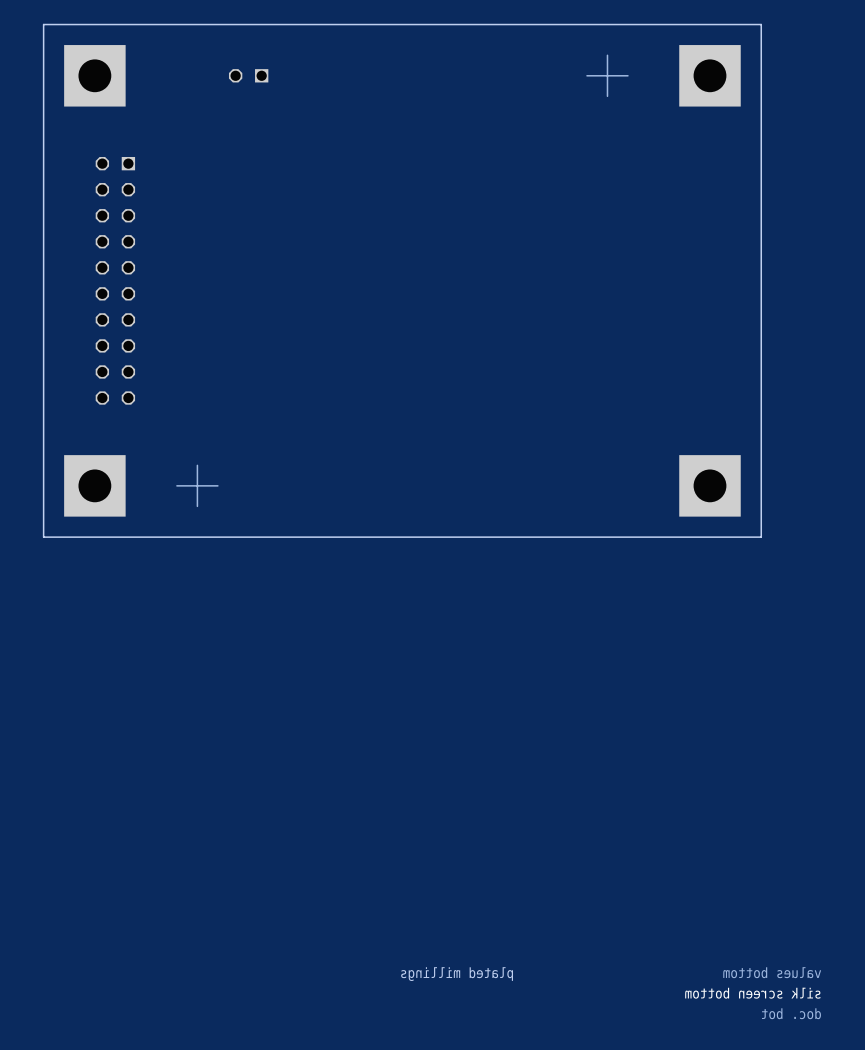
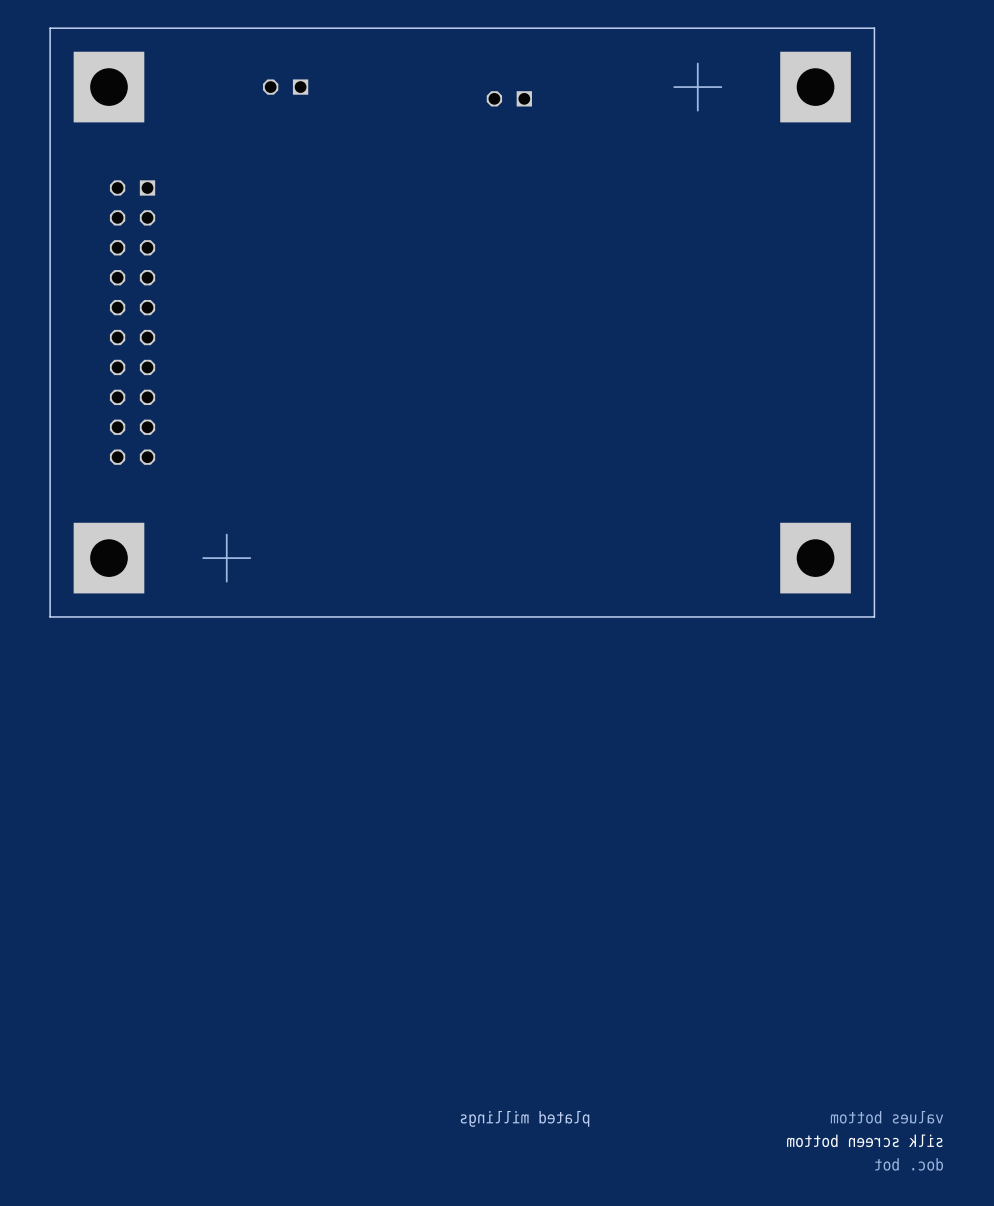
part: none -> (509, 98)

